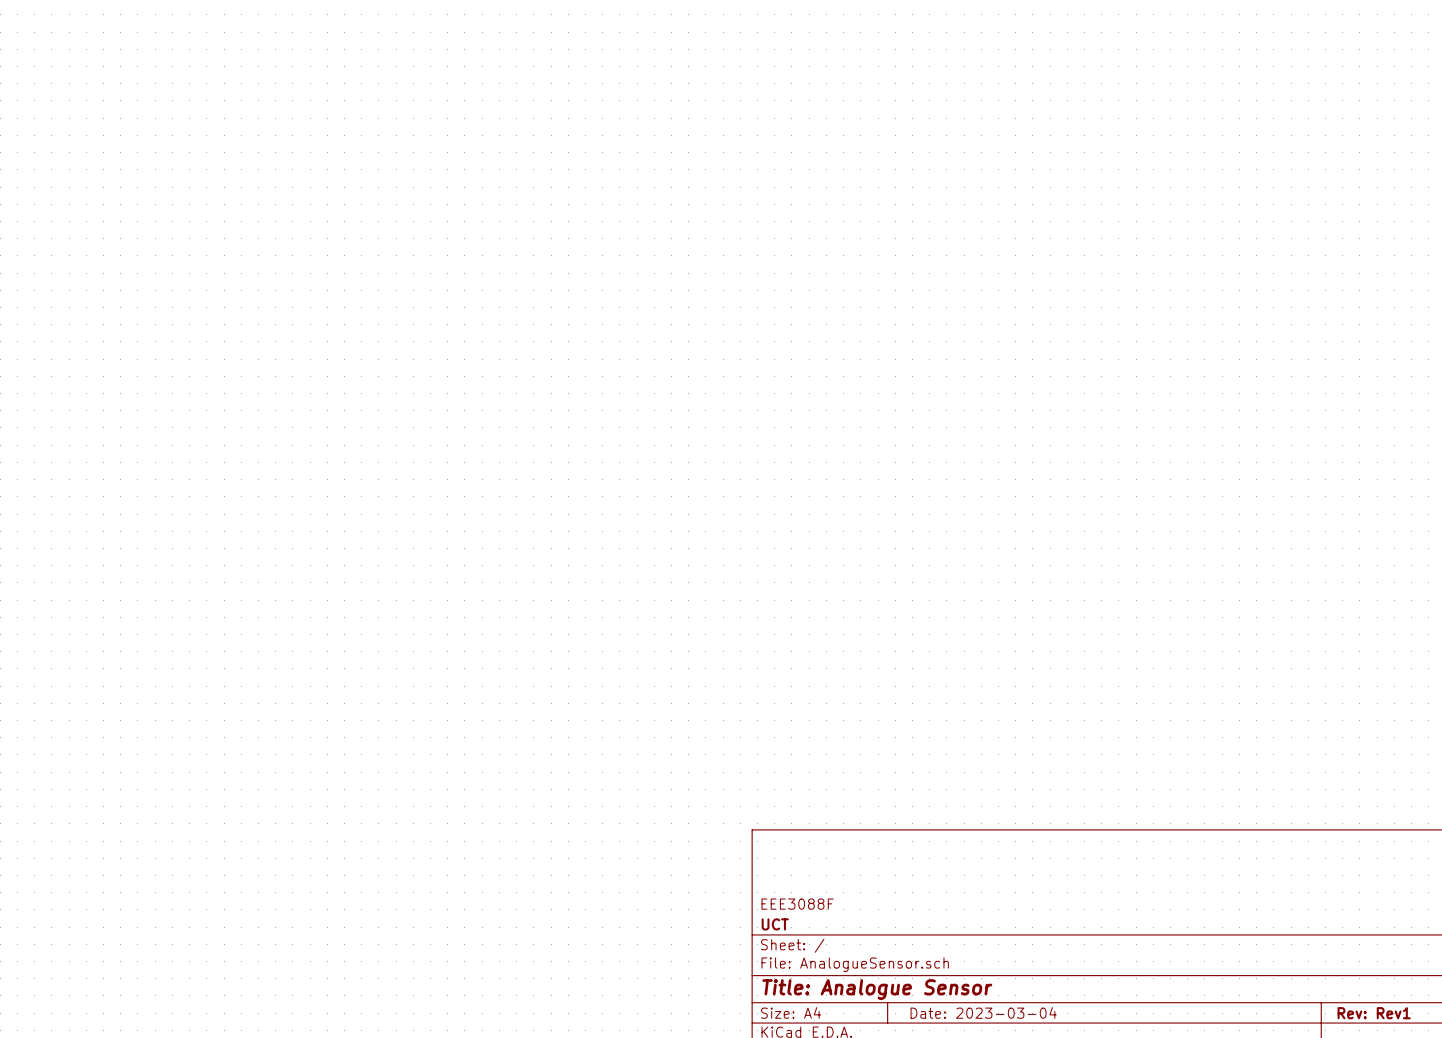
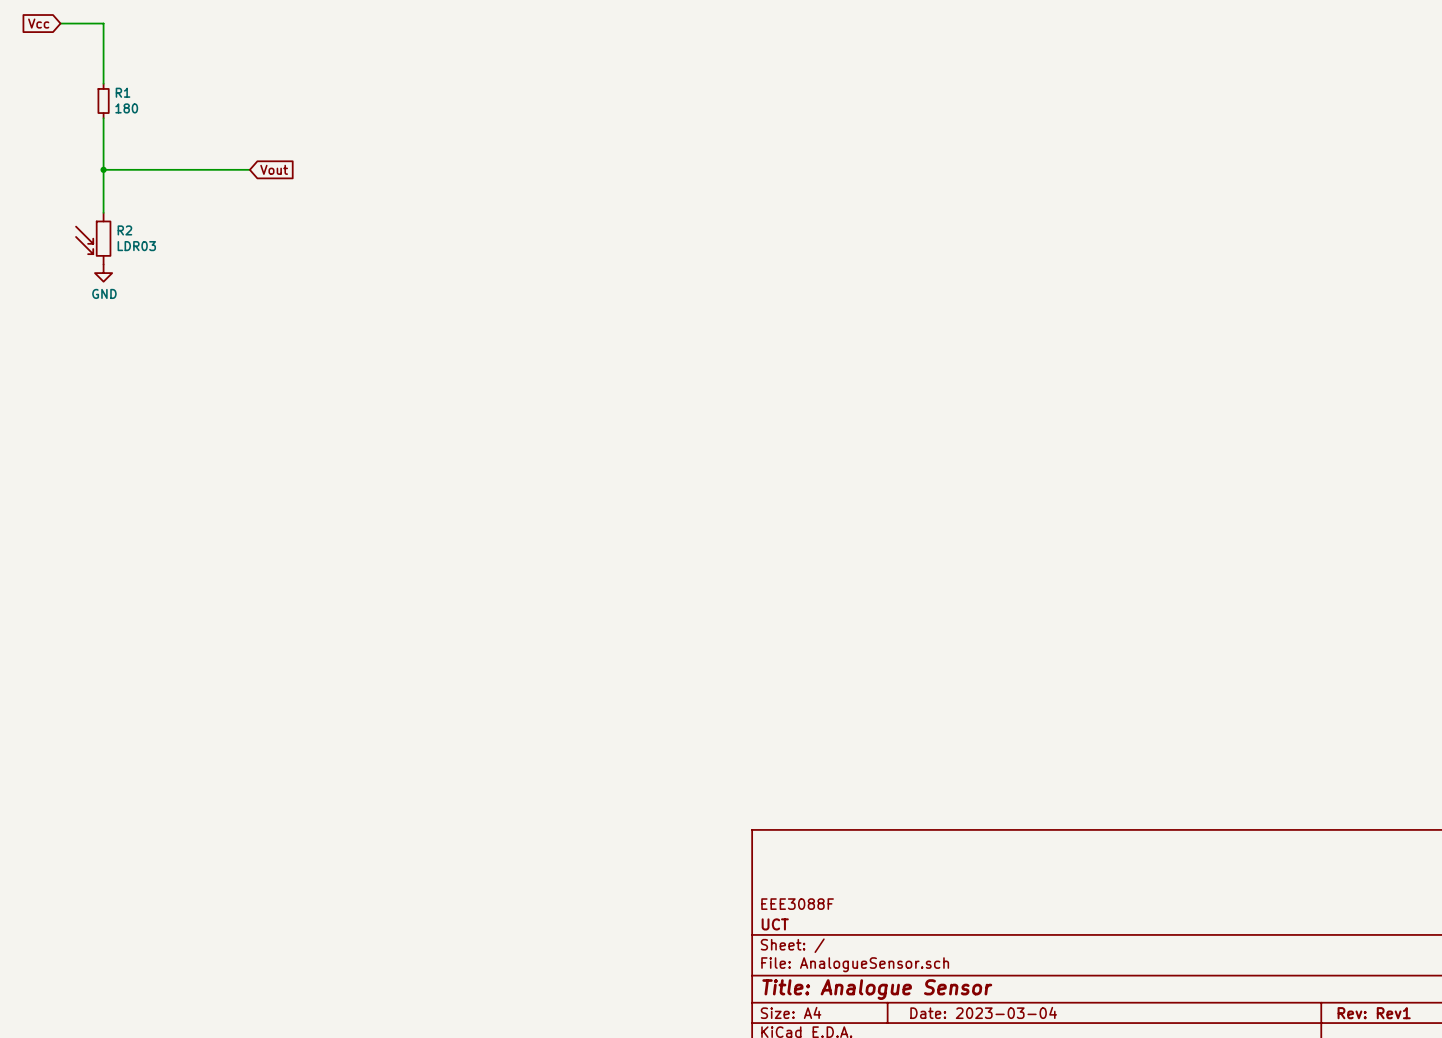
global label: none -> Vcc (38, 23)
wire: none -> (60, 23) (103, 23) (103, 83)
R1: none -> 180 (103, 100)
wire: none -> (103, 118) (103, 212)
wire: none -> (103, 169) (249, 169)
junction: none -> (103, 169)
global label: none -> Vout (274, 169)
R2: none -> LDR03 (93, 238)
power symbol: none -> GND (103, 273)

